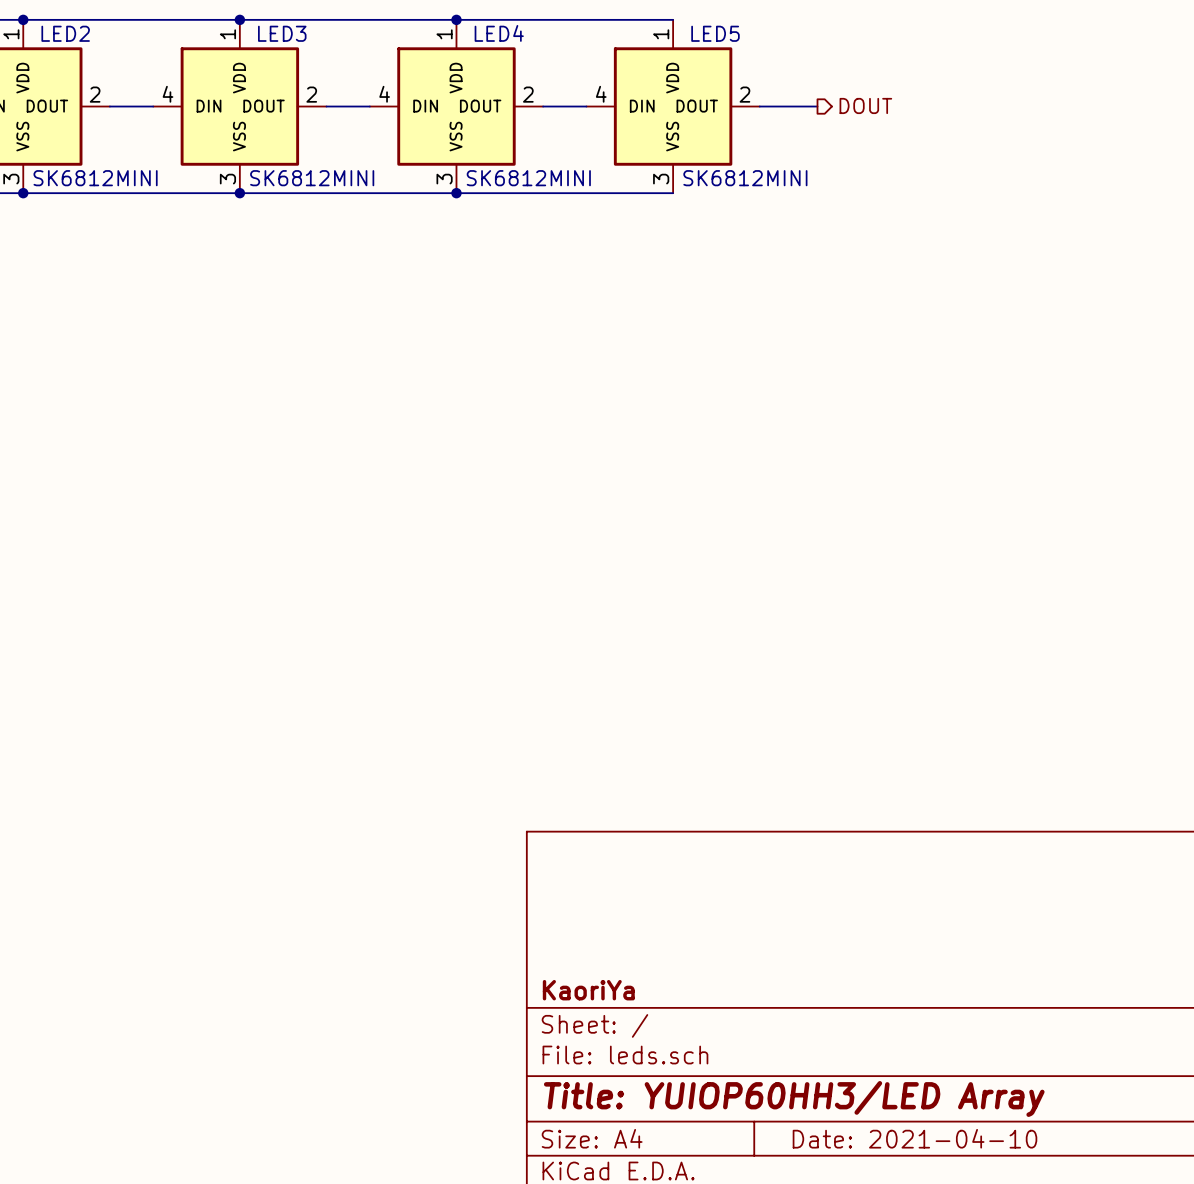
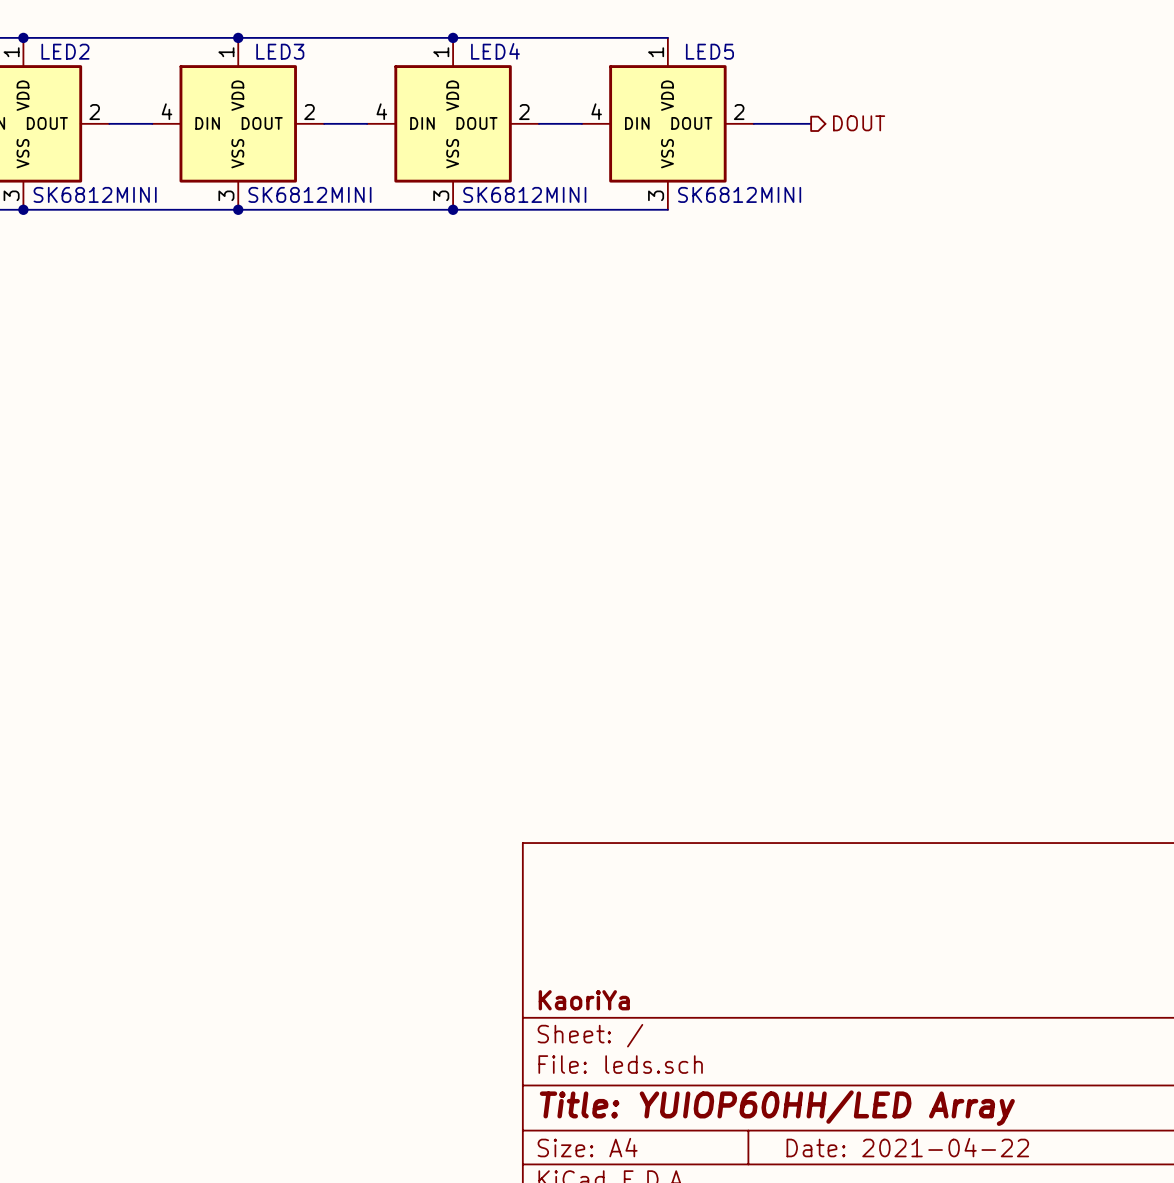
title block: Title: YUIOP60HH3/LED Array (794, 1098) -> Title: YUIOP60HH/LED Array (777, 1108)
title block: Date: 2021-04-10 (914, 1138) -> Date: 2021-04-22 (907, 1147)

